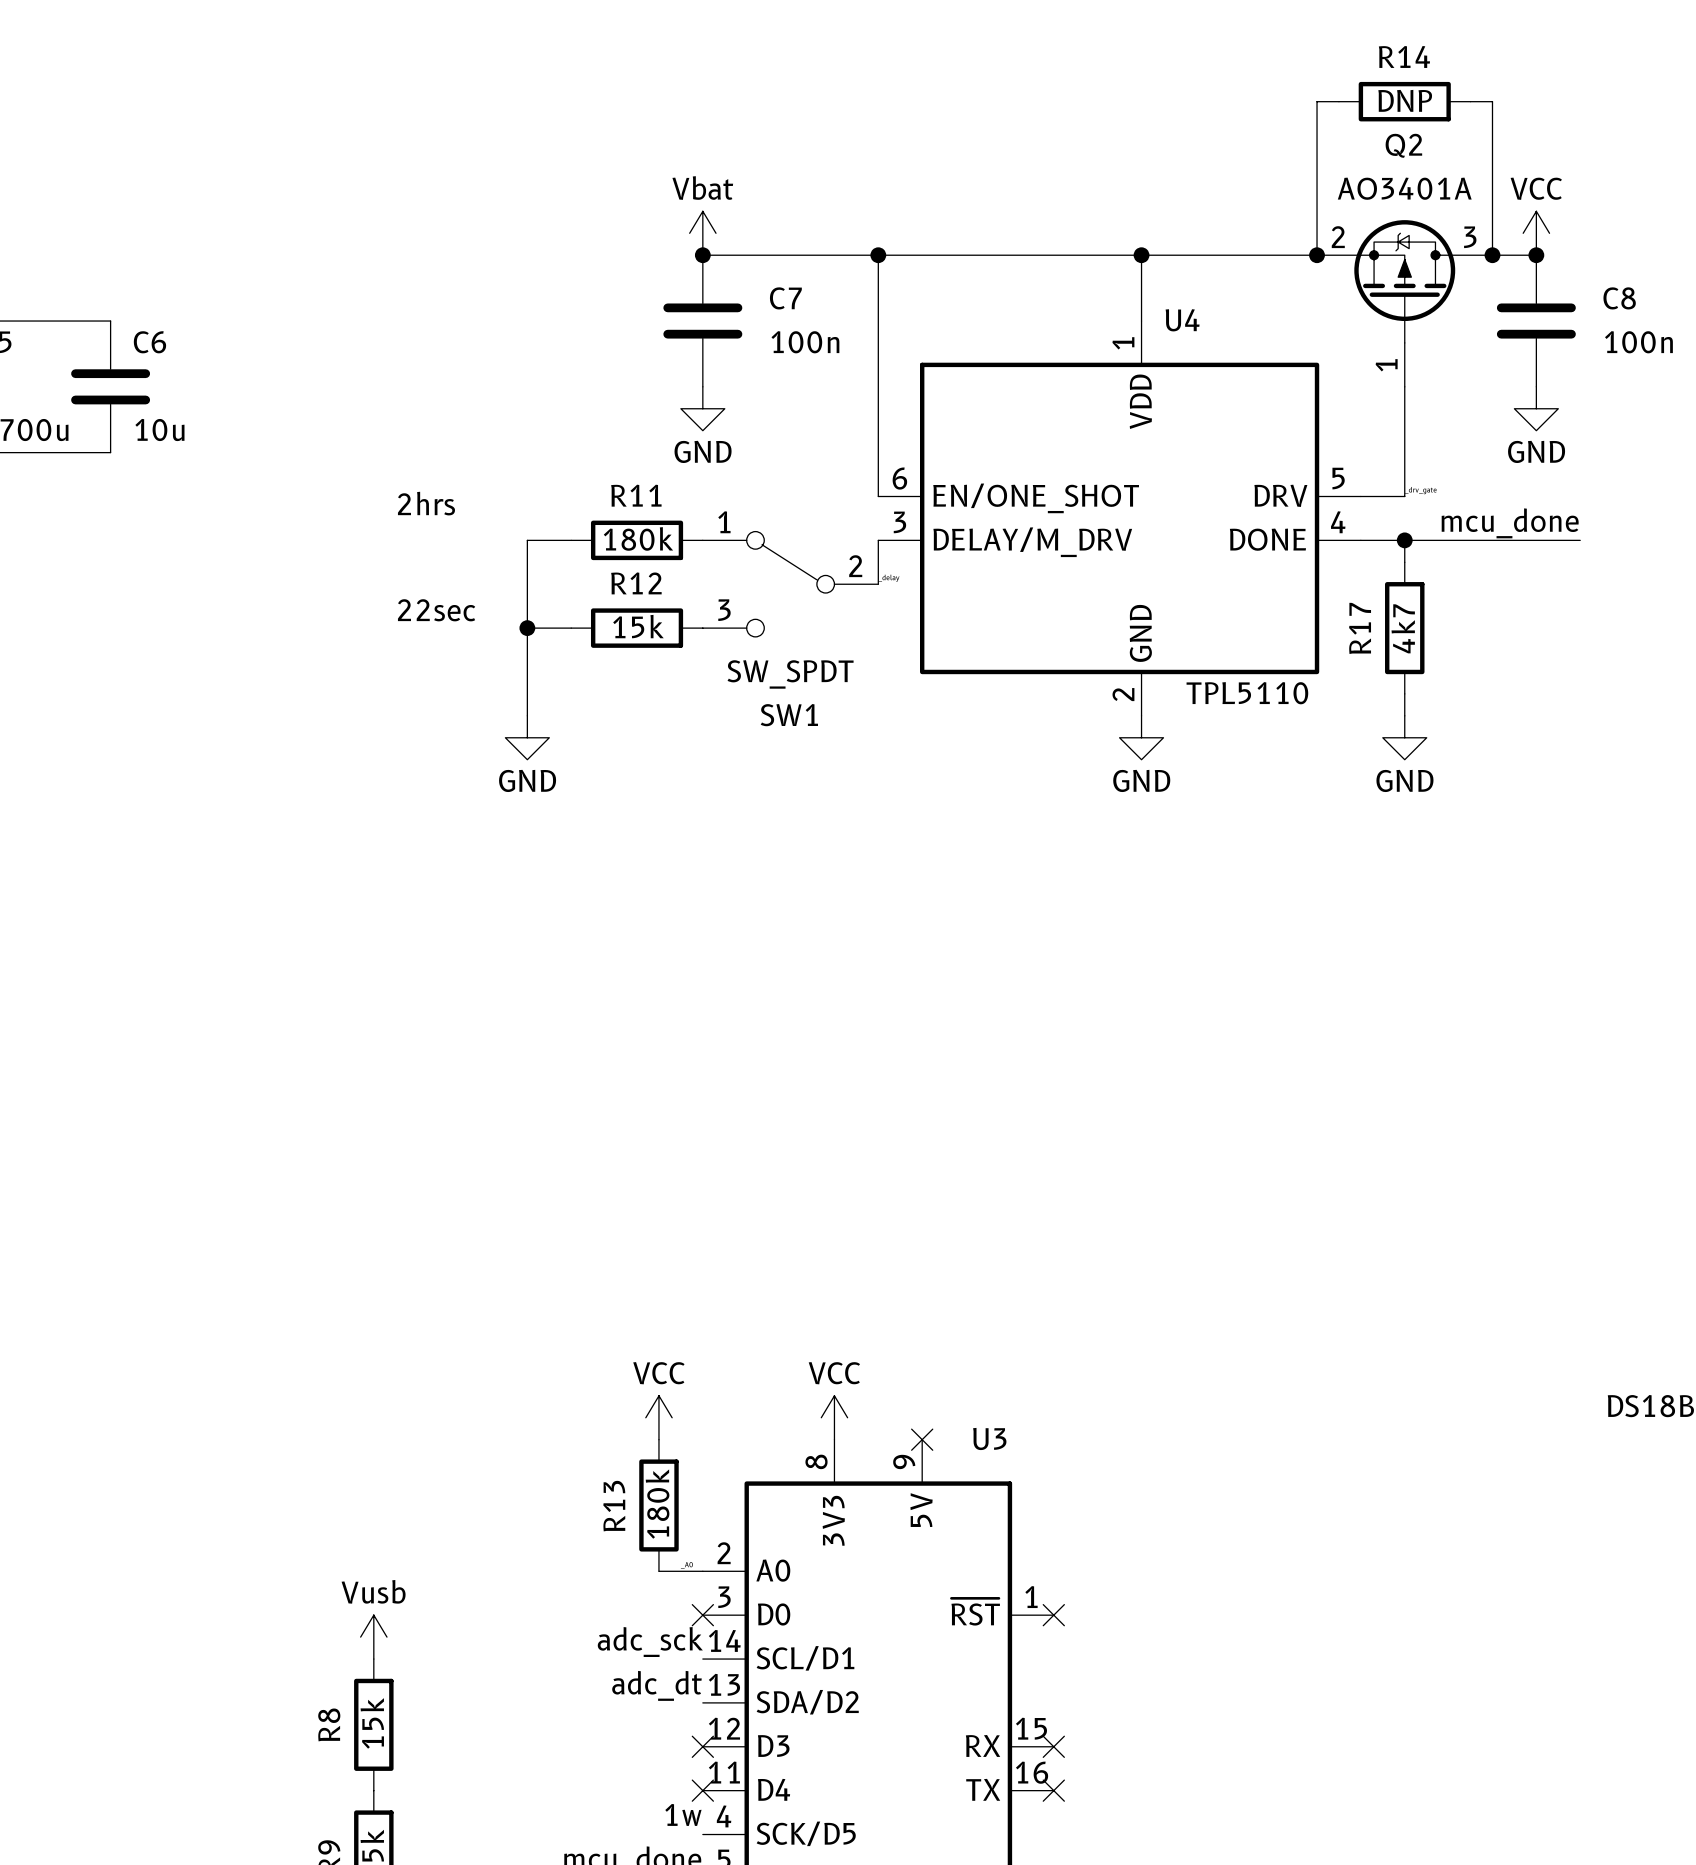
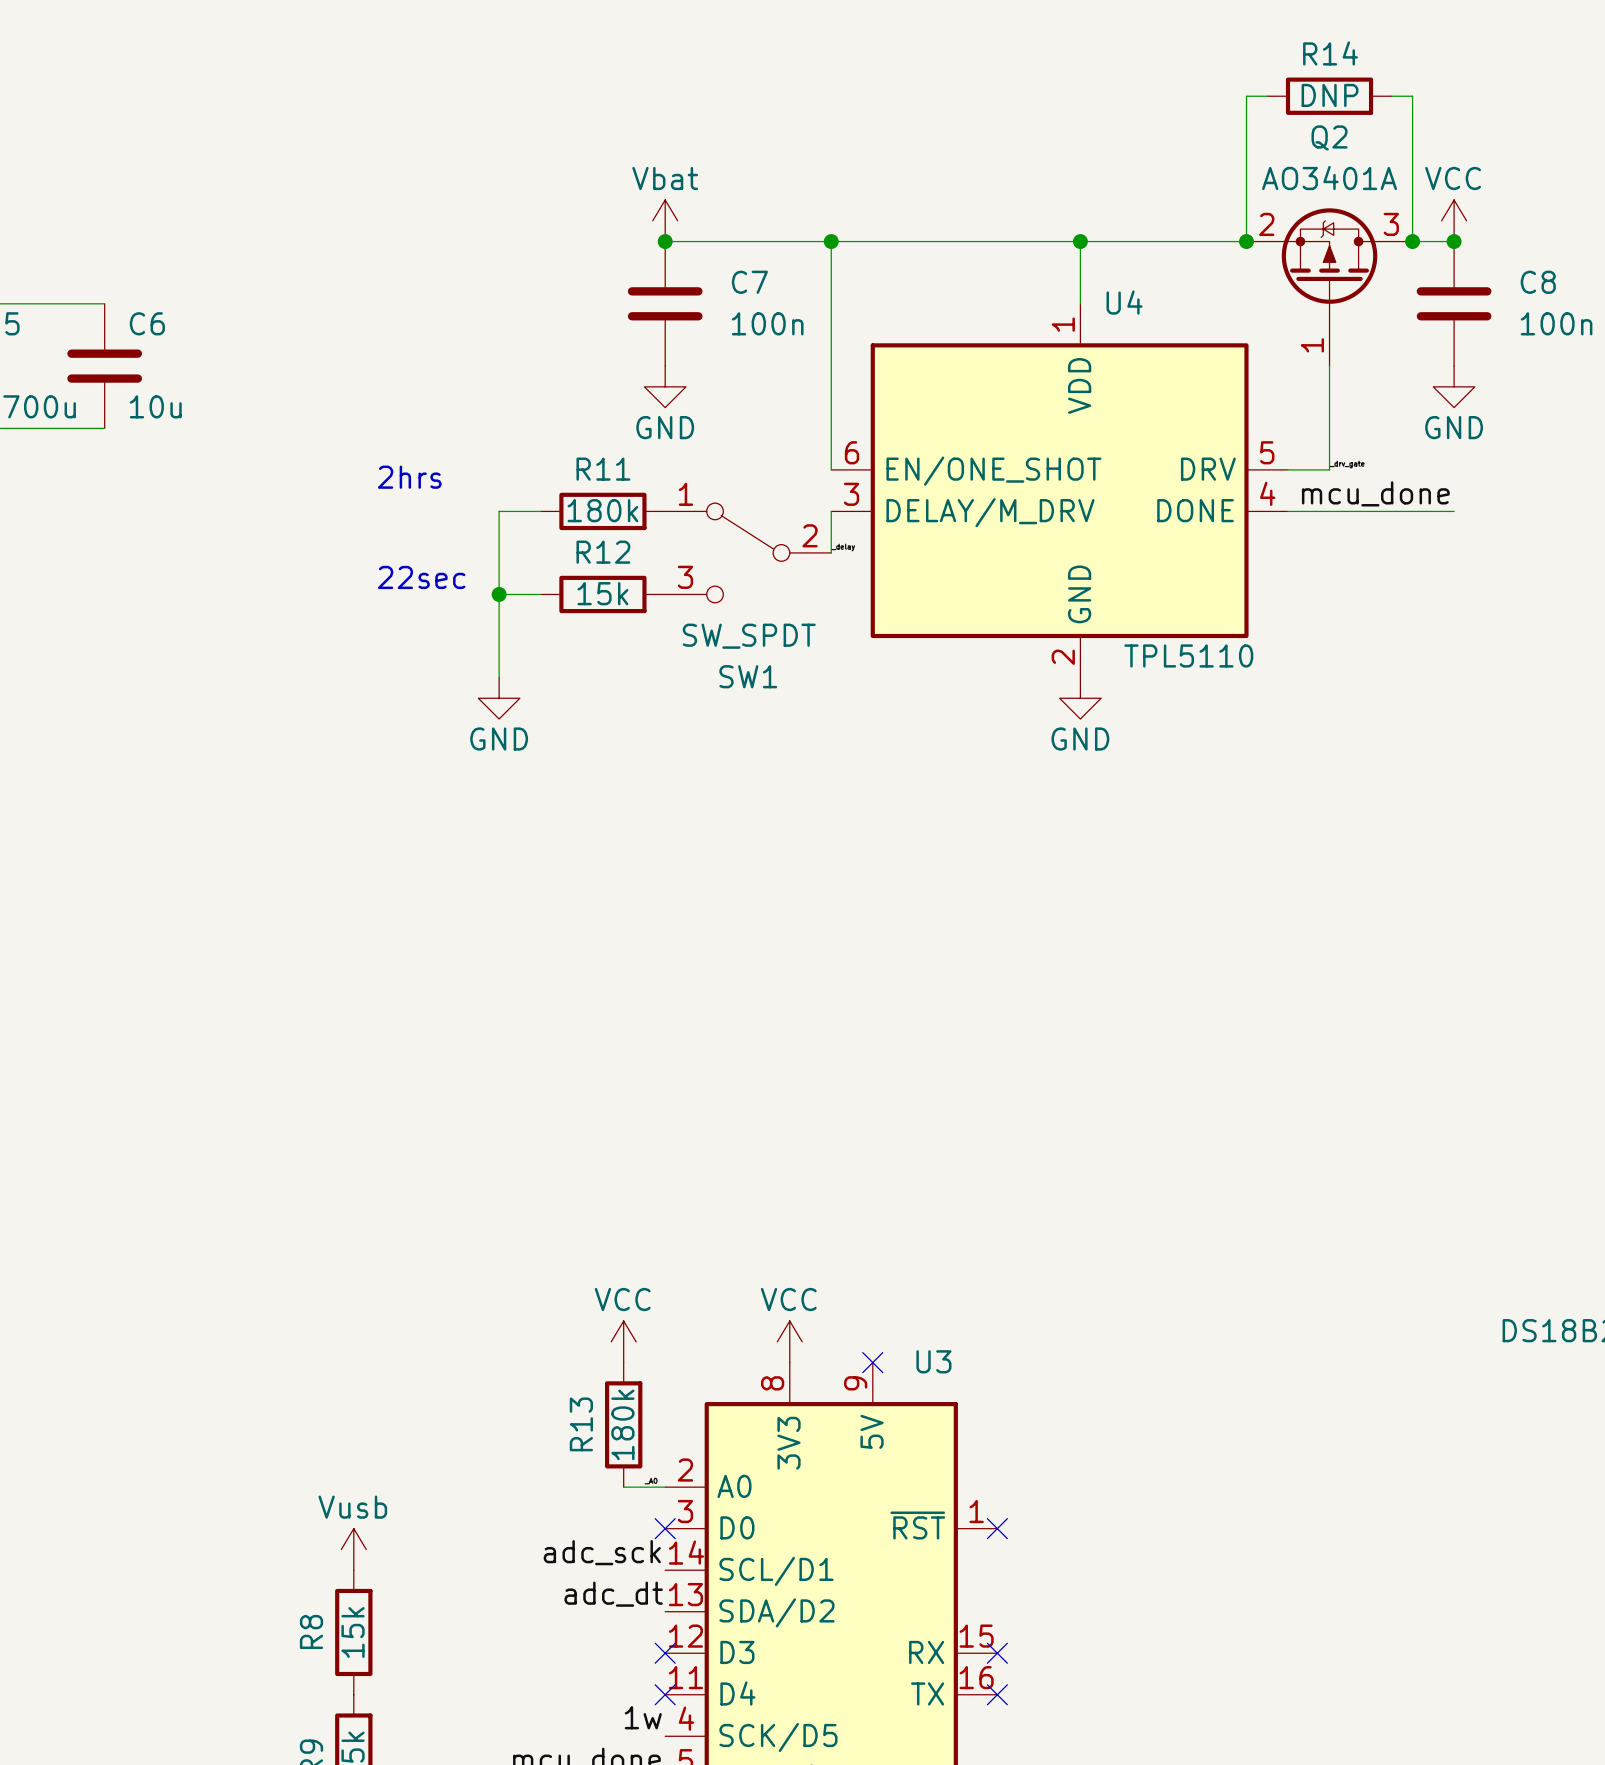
label position: mcu_done (1510, 523) -> mcu_done (1375, 493)
wire: (1404, 540) (1404, 562) -> none
junction: (1404, 540) -> none
wire: (1536, 540) (1580, 540) -> none
R17: 4k7 (1404, 628) -> none
wire: (1404, 693) (1404, 715) -> none
power symbol: GND (1404, 737) -> none

